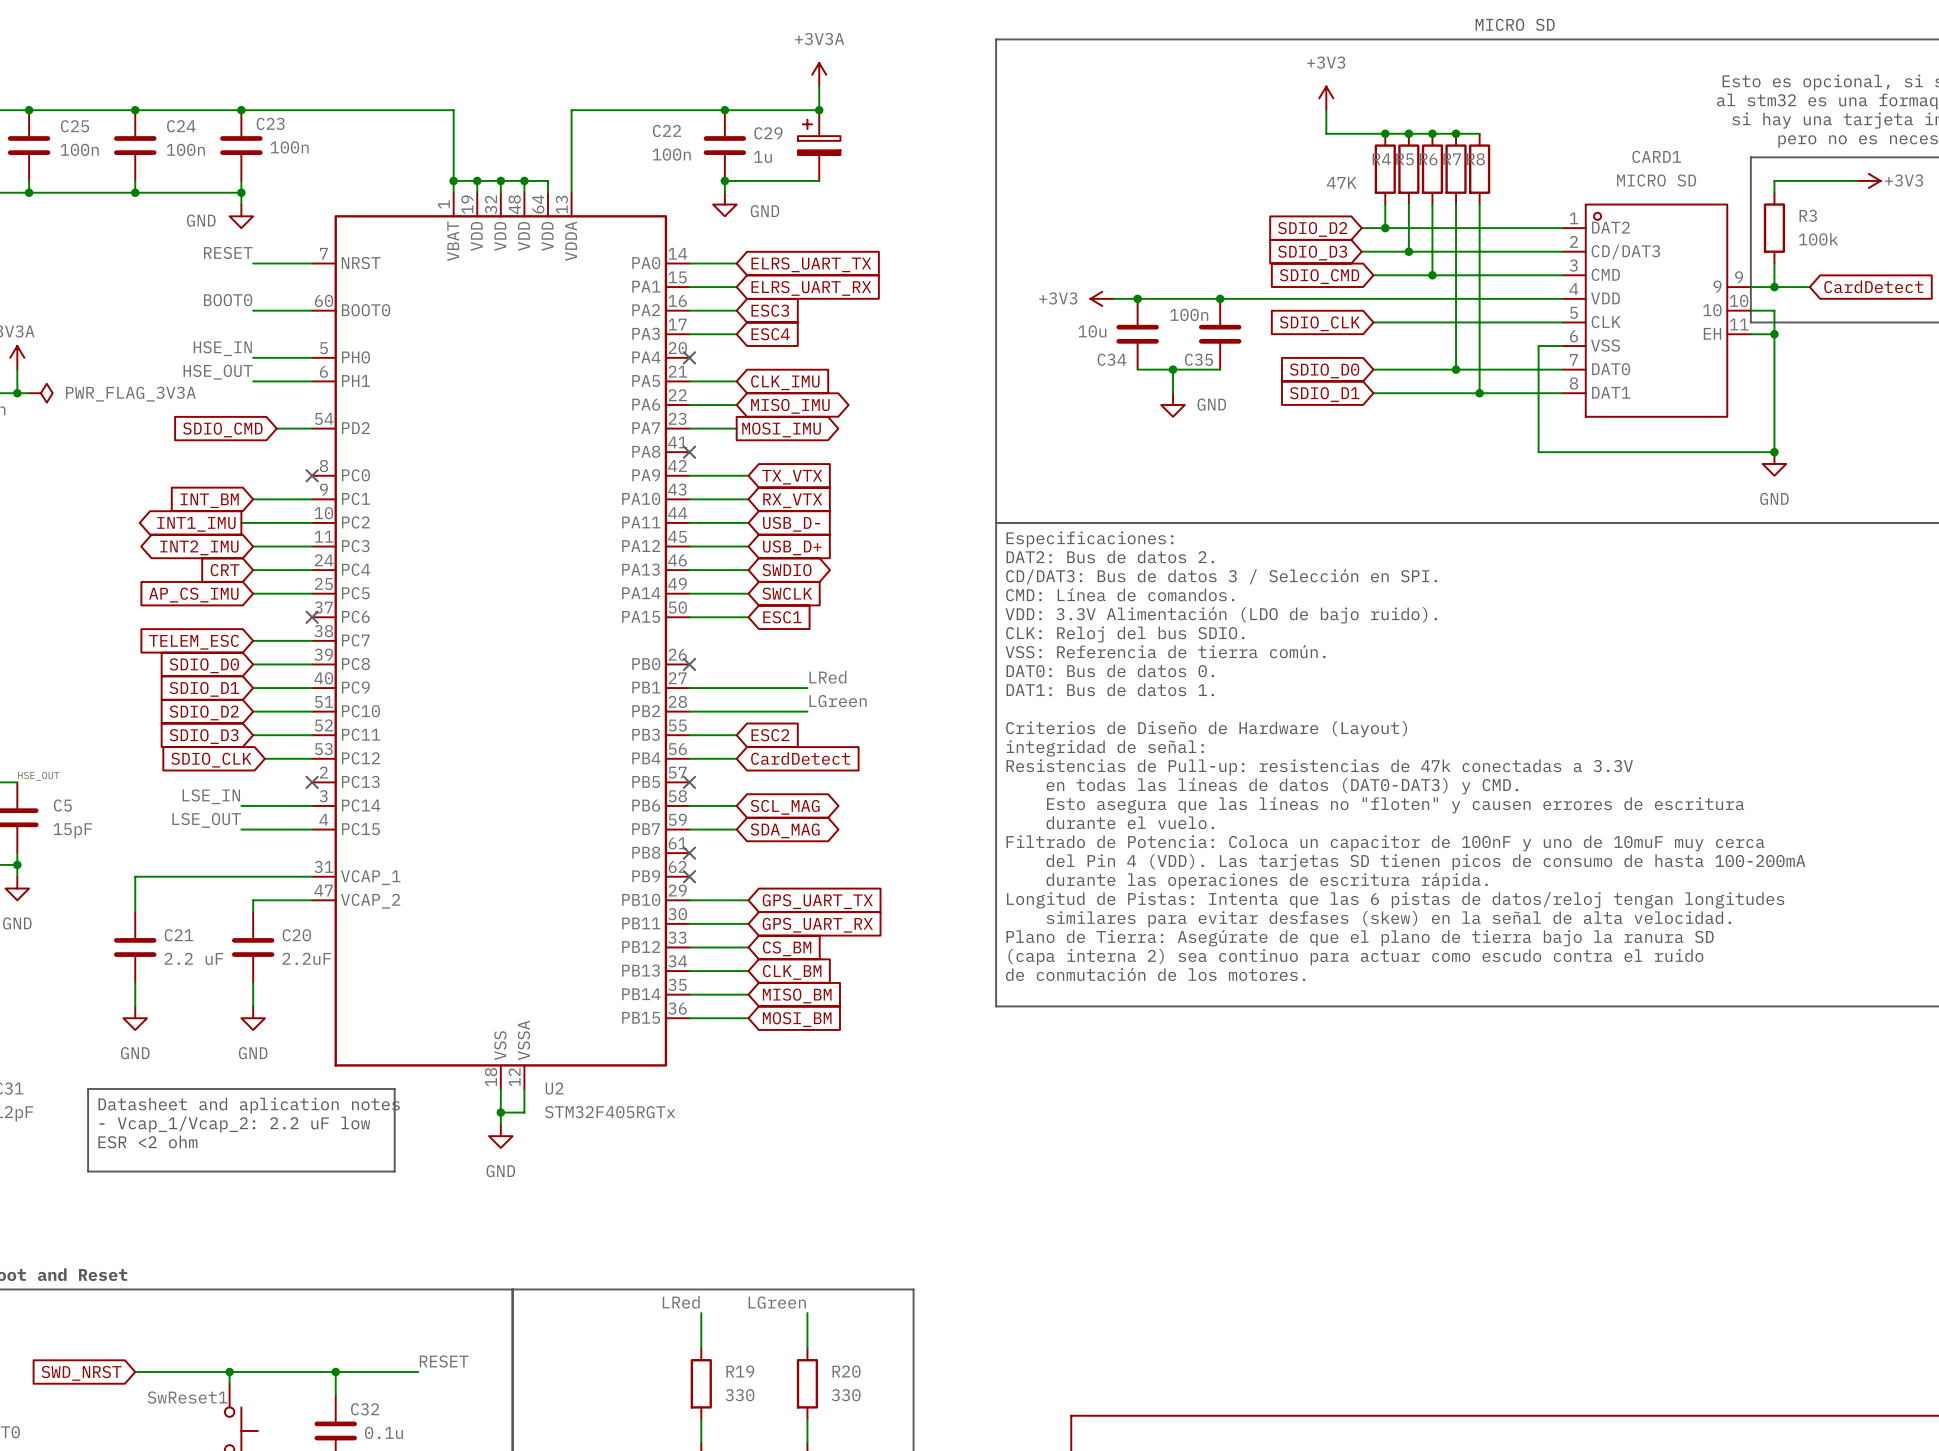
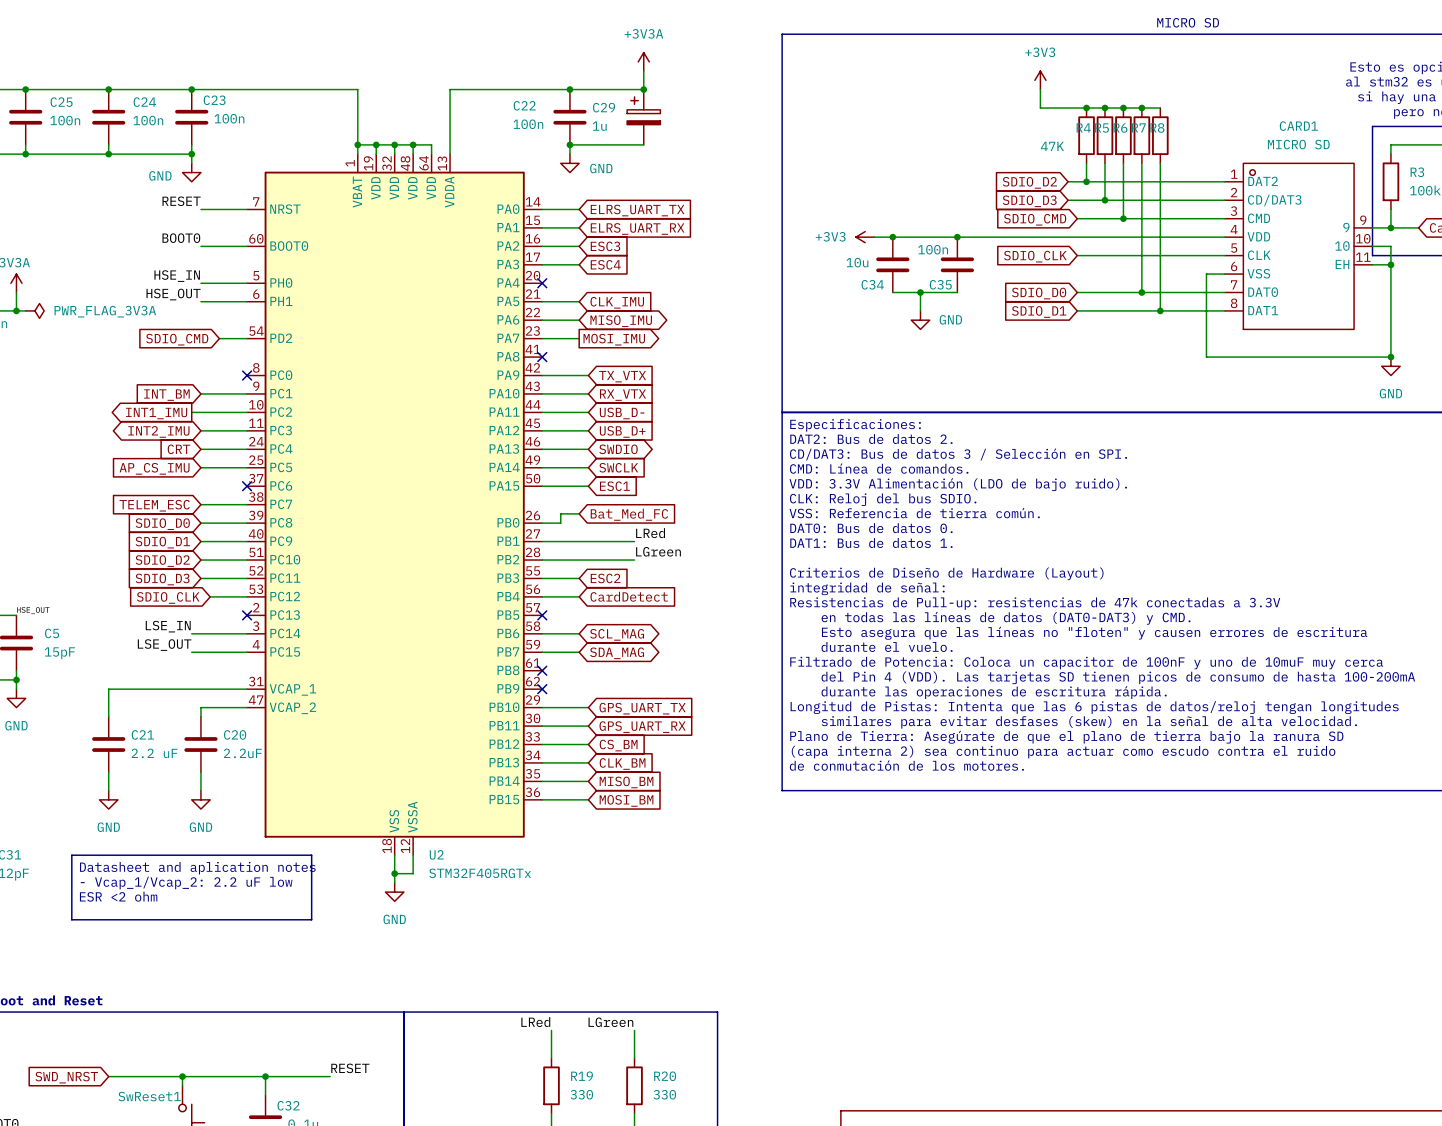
wire: none -> (579, 513) (560, 513) (560, 523) (542, 523)
global label: none -> Bat_Med_FC (629, 514)
no-connect mark: (689, 664) -> none

